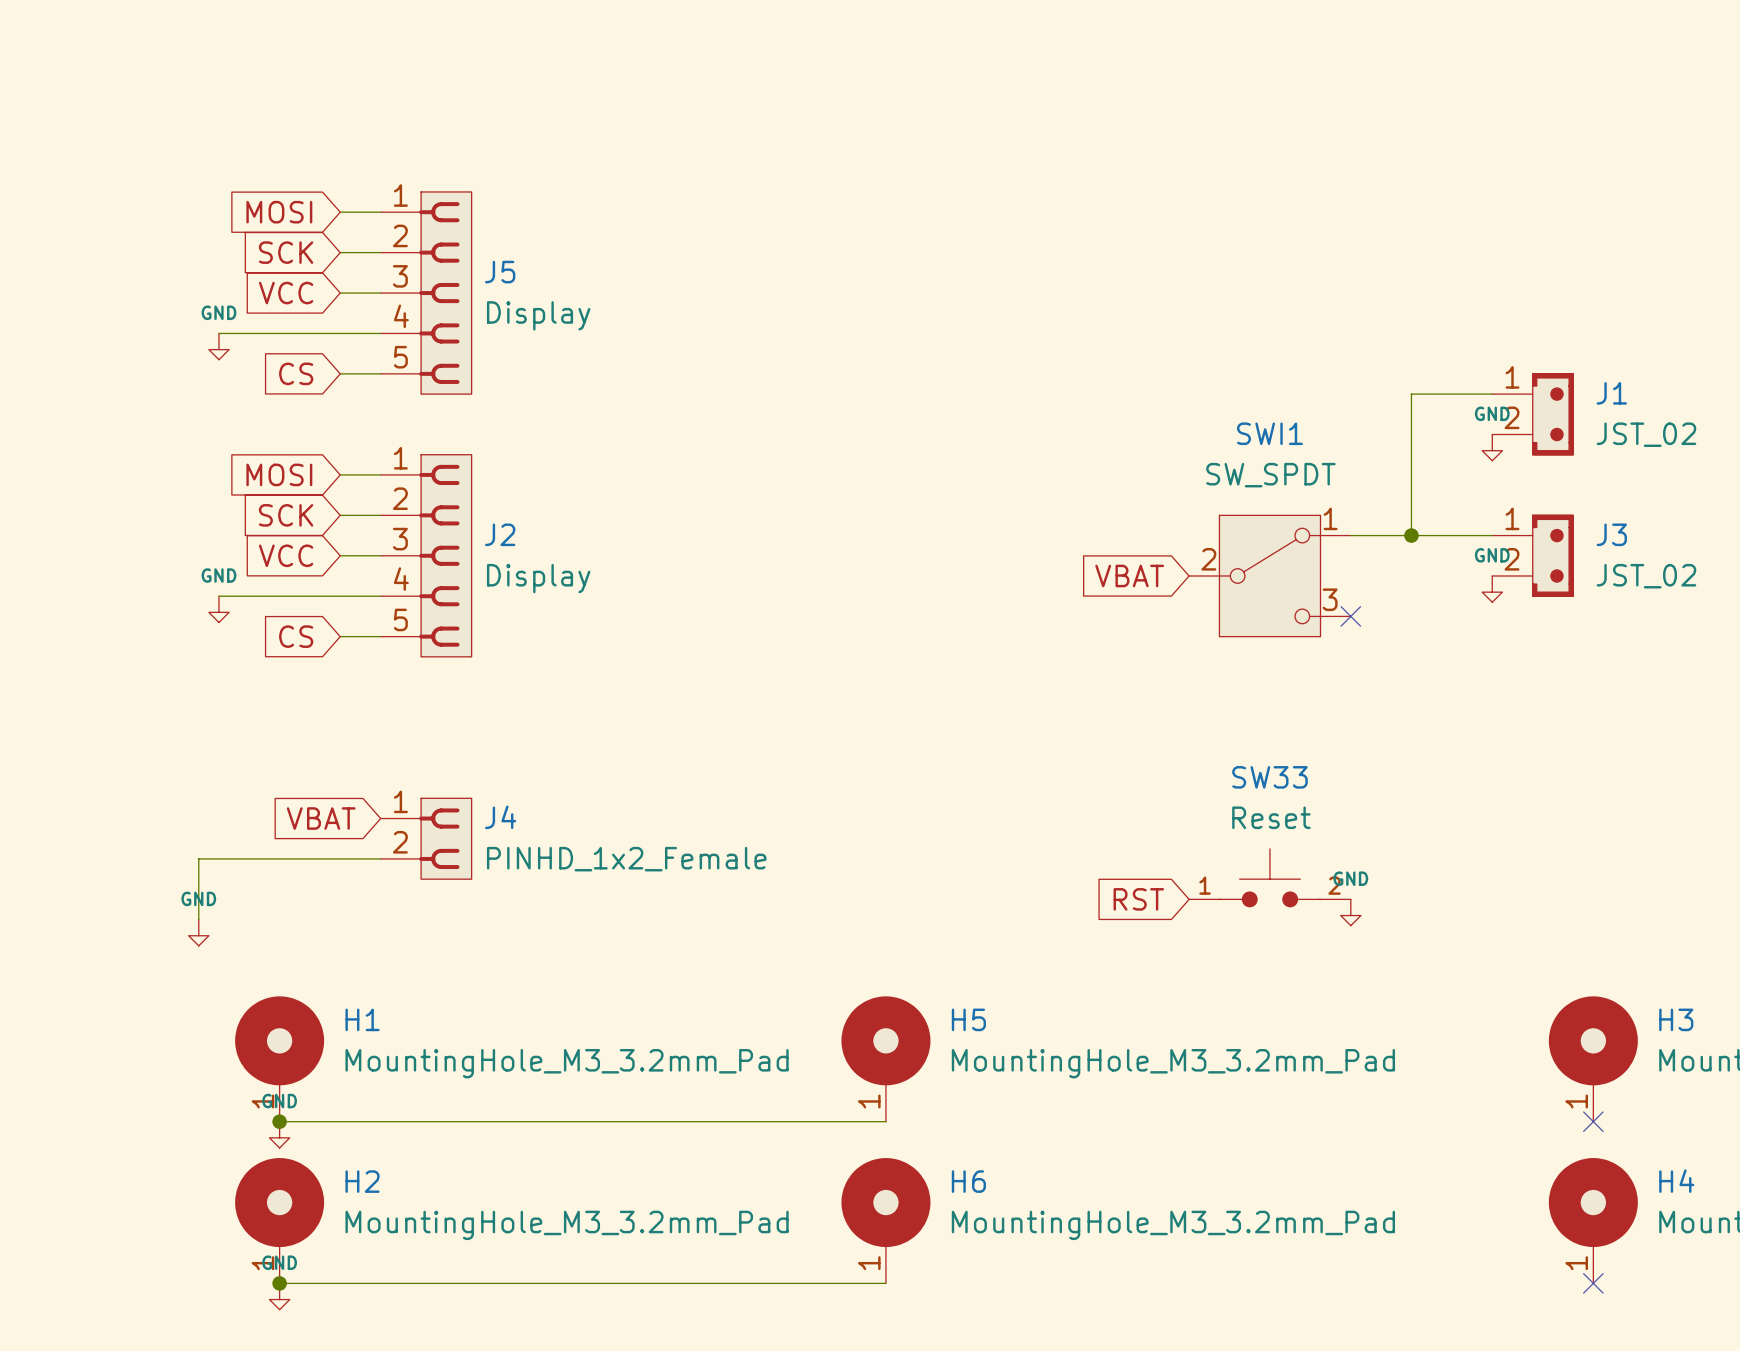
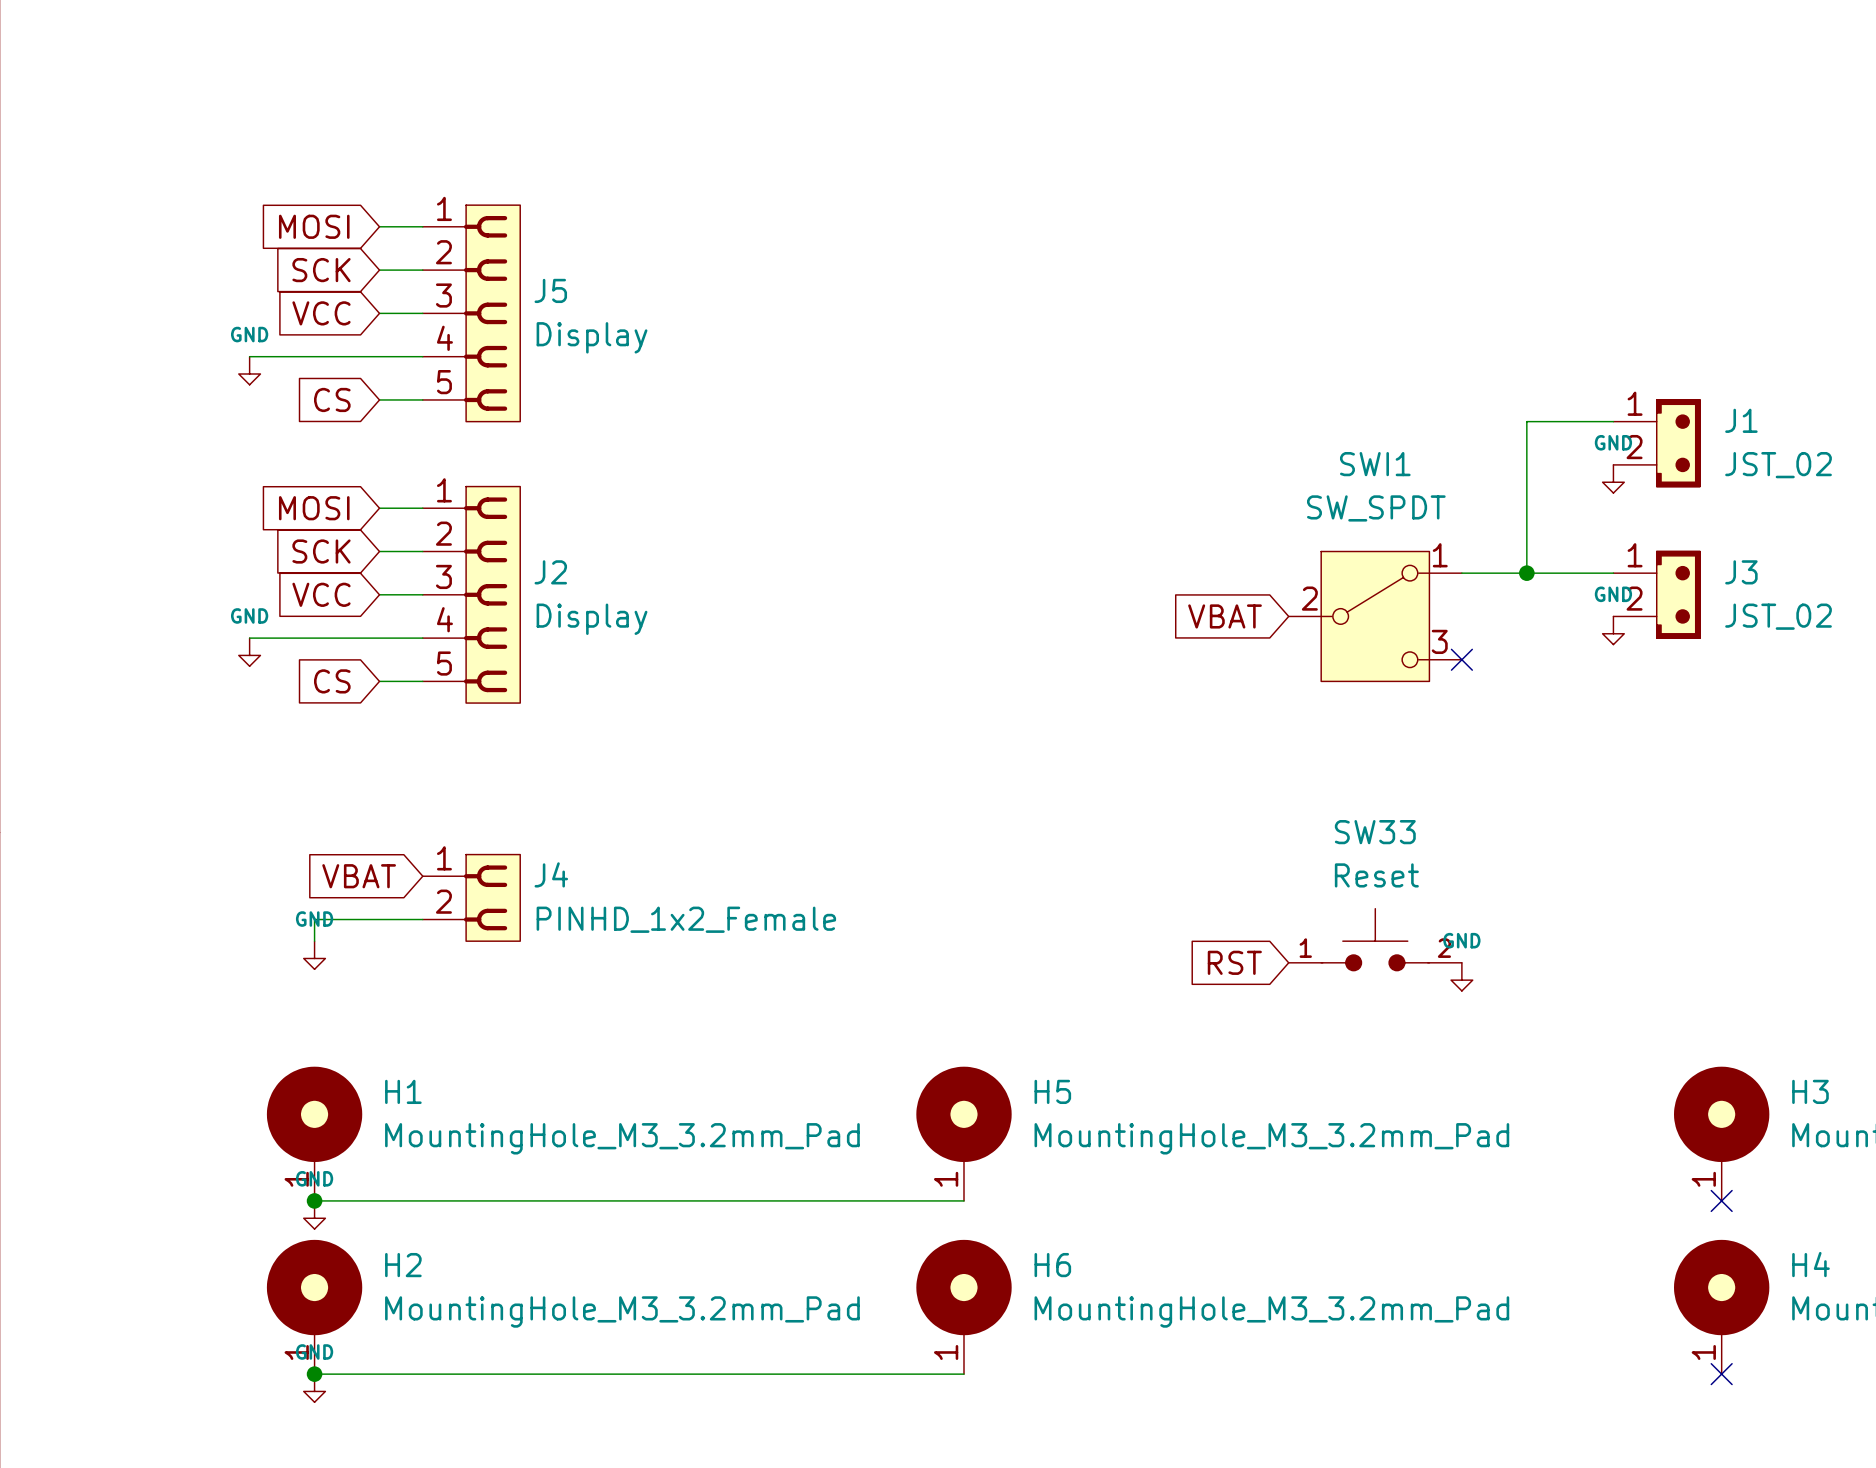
wire: (279, 858) (198, 858) (198, 919) -> (314, 919) (314, 941)
power symbol position: GND (198, 932) -> GND (314, 955)

